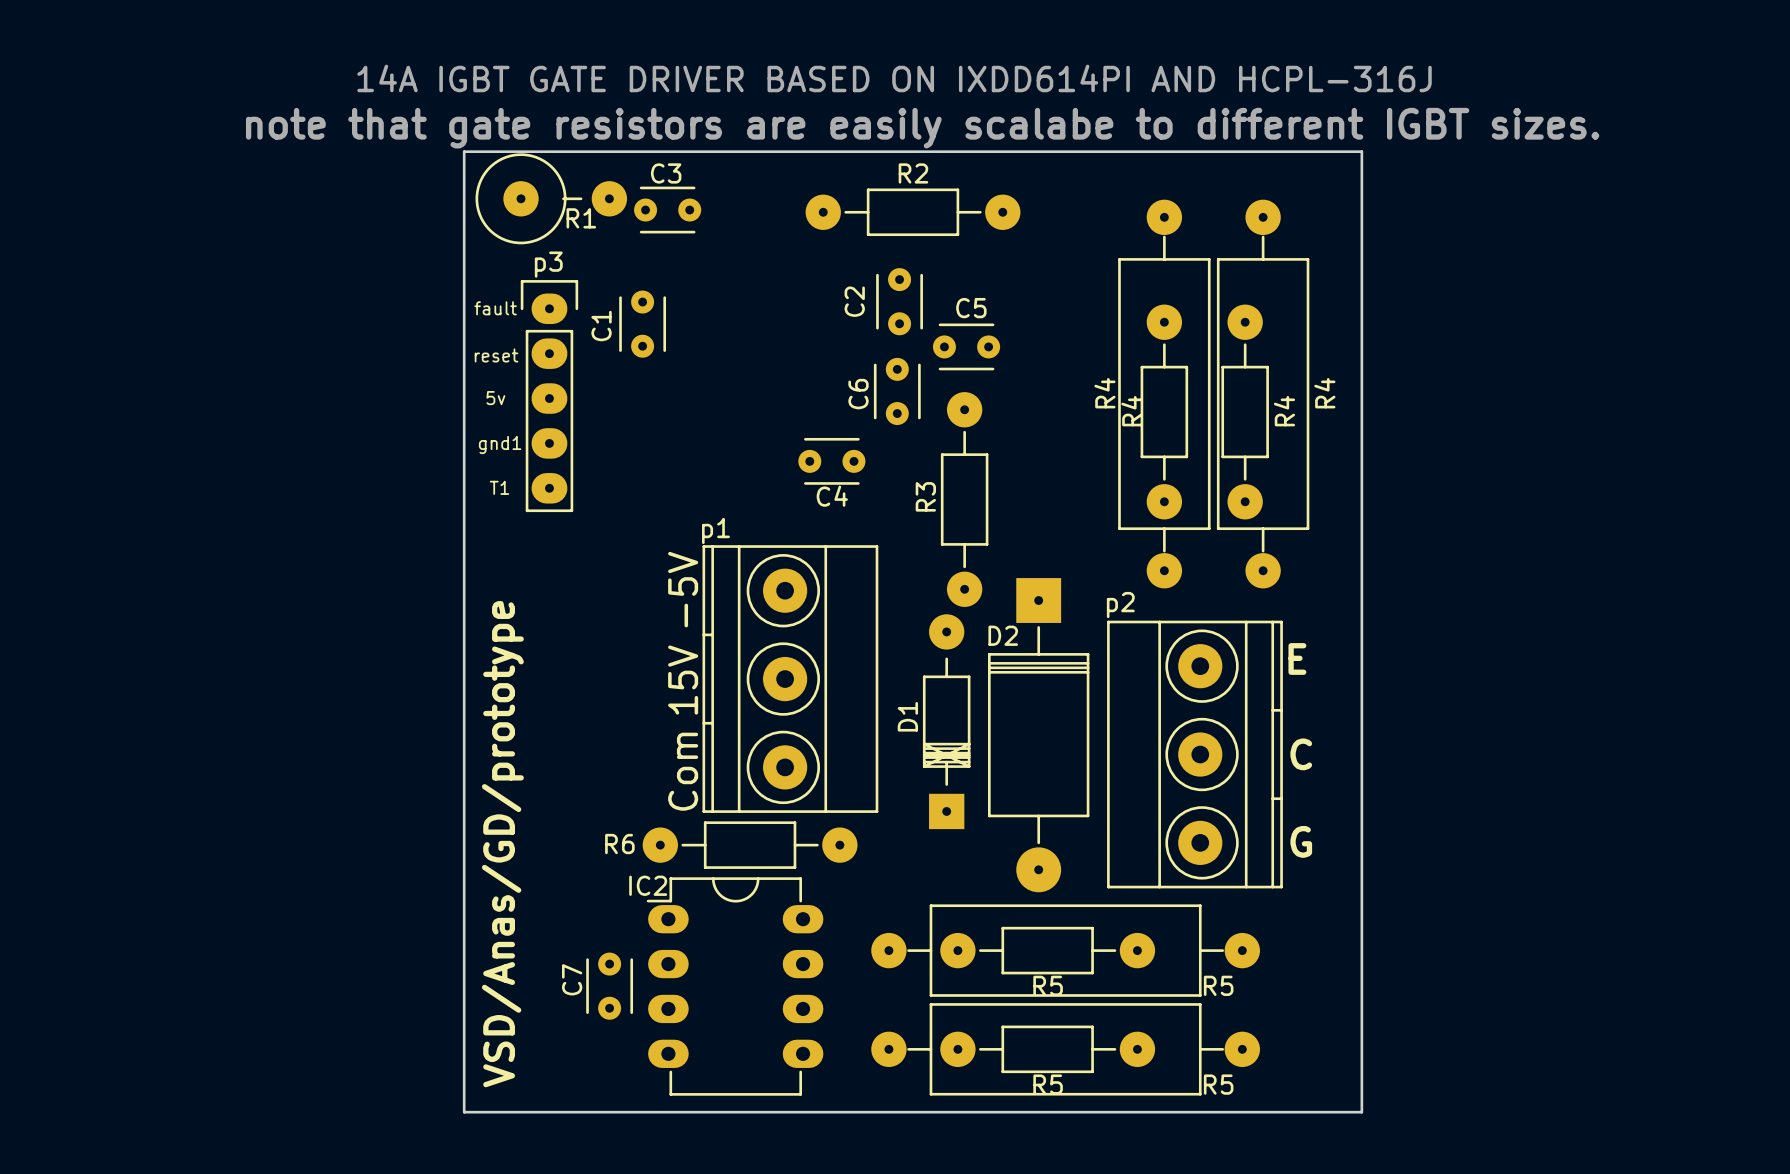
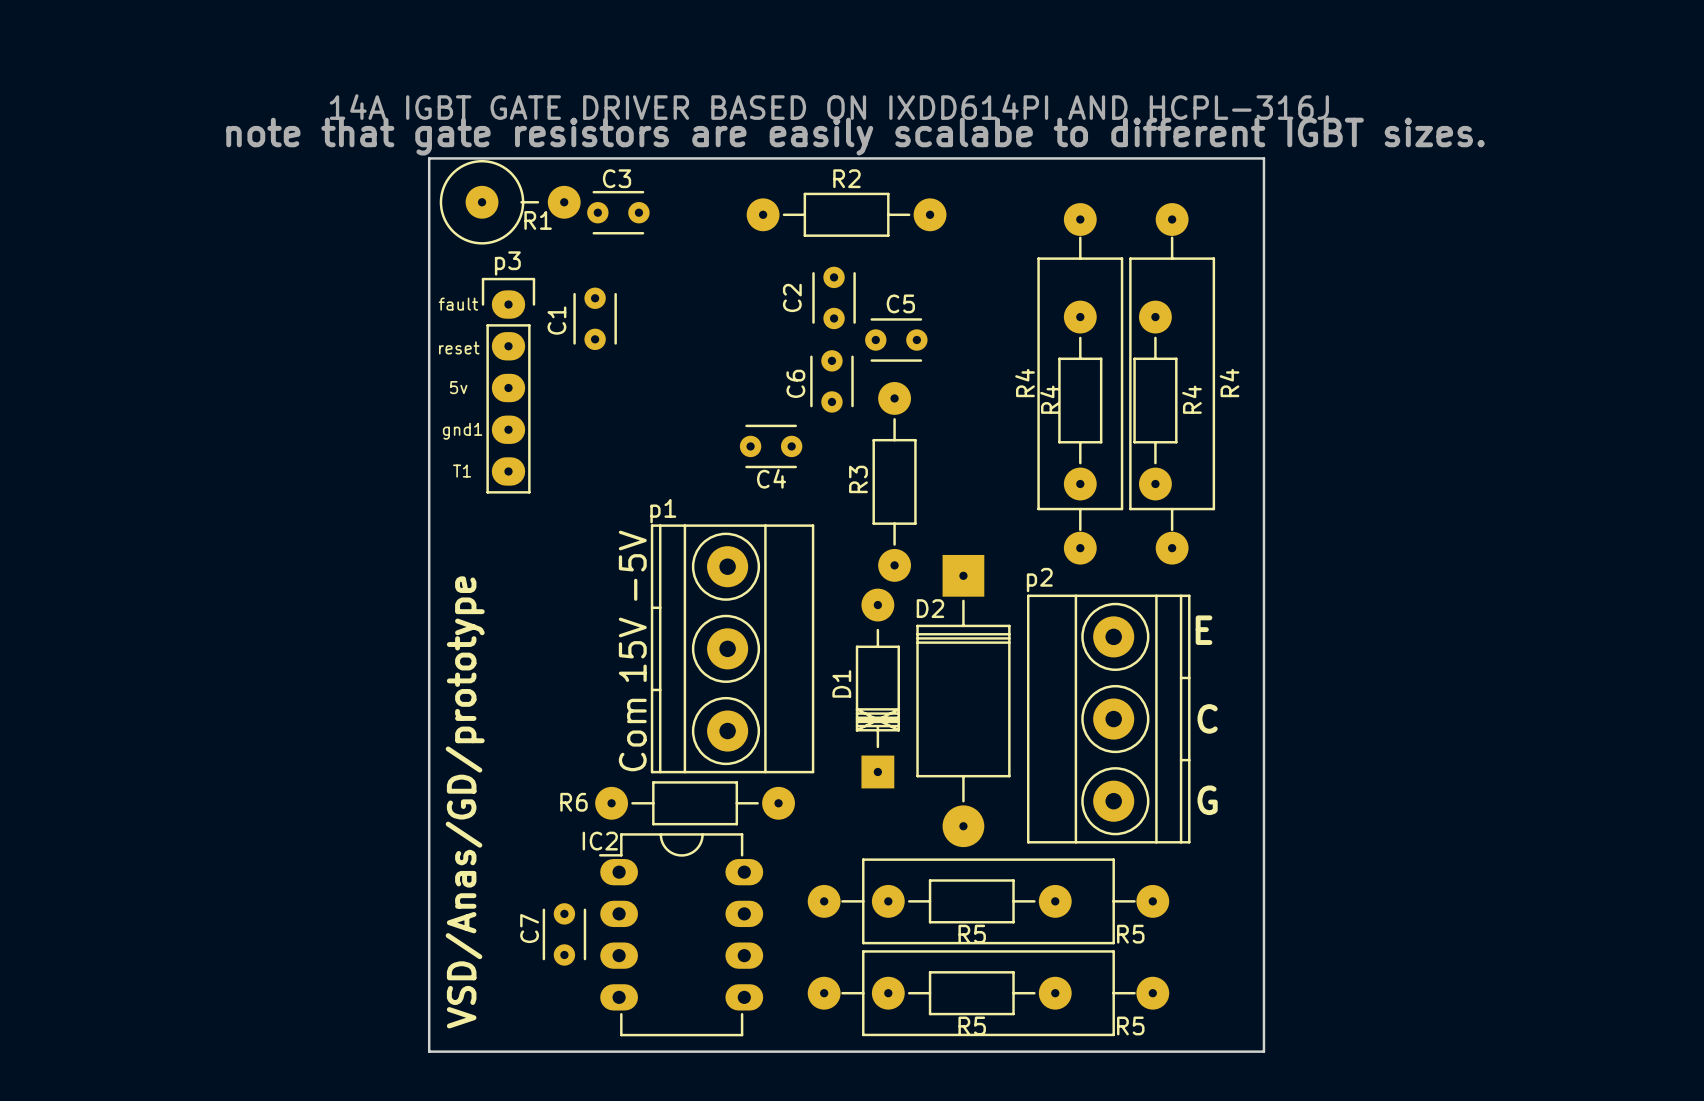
text position: 14A IGBT GATE DRIVER BASED ON IXDD614PI AND HCPL-316J (894, 78) -> 14A IGBT GATE DRIVER BASED ON IXDD614PI AND HCPL-316J (829, 107)

